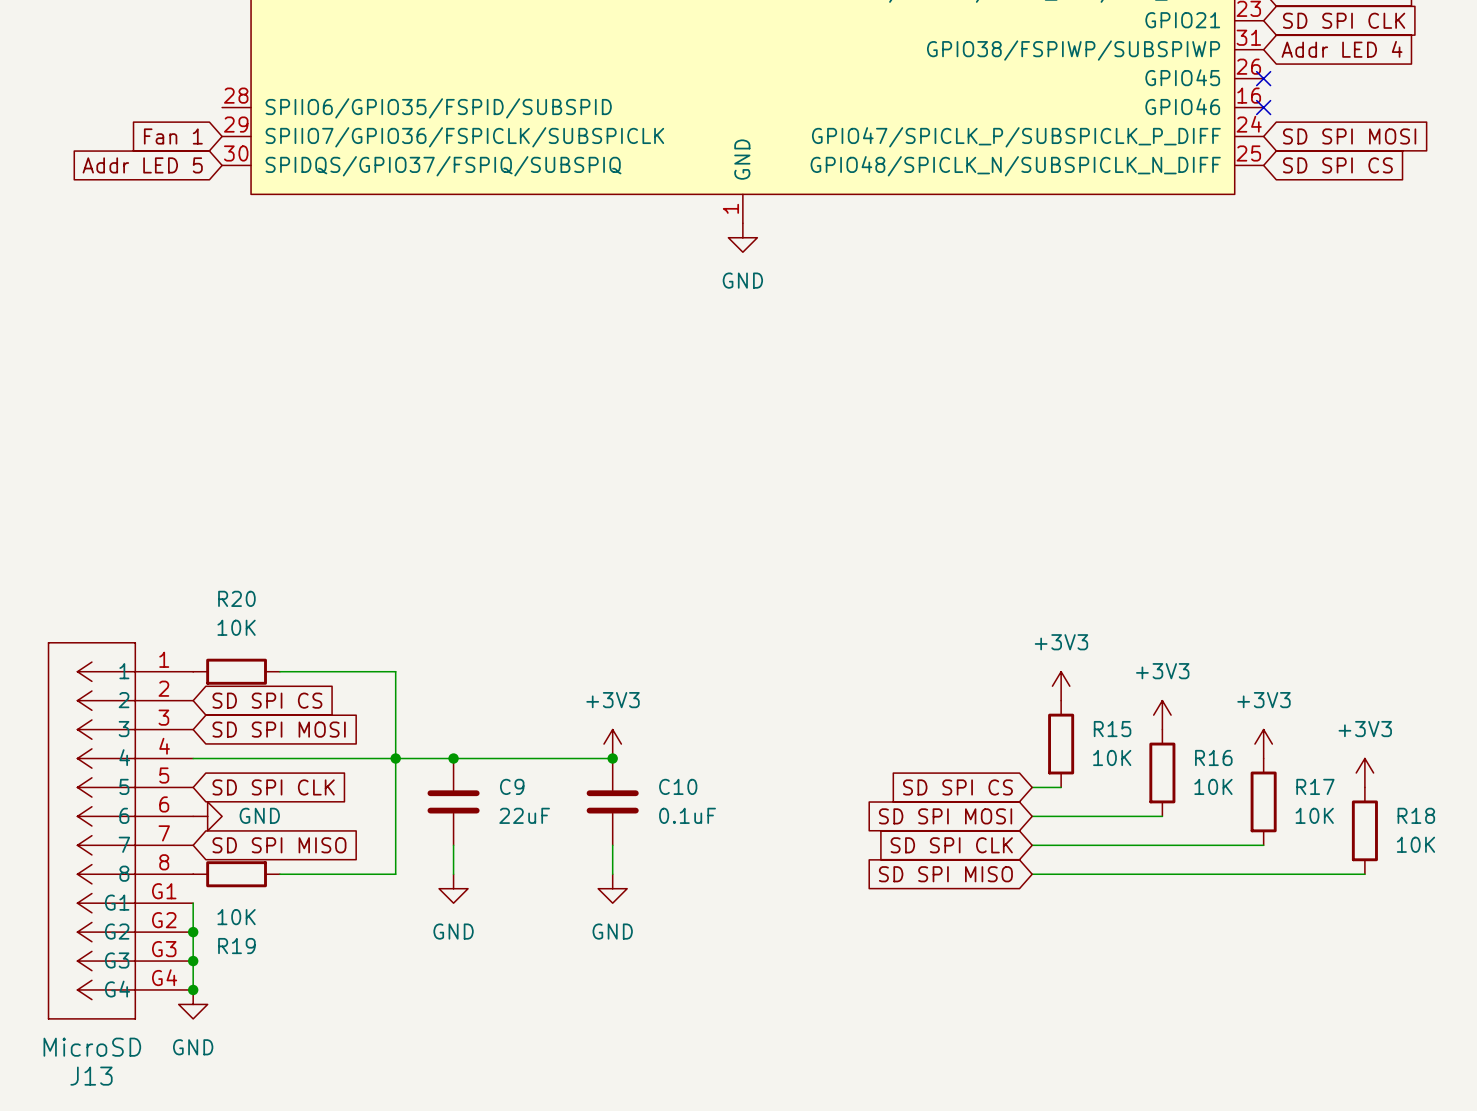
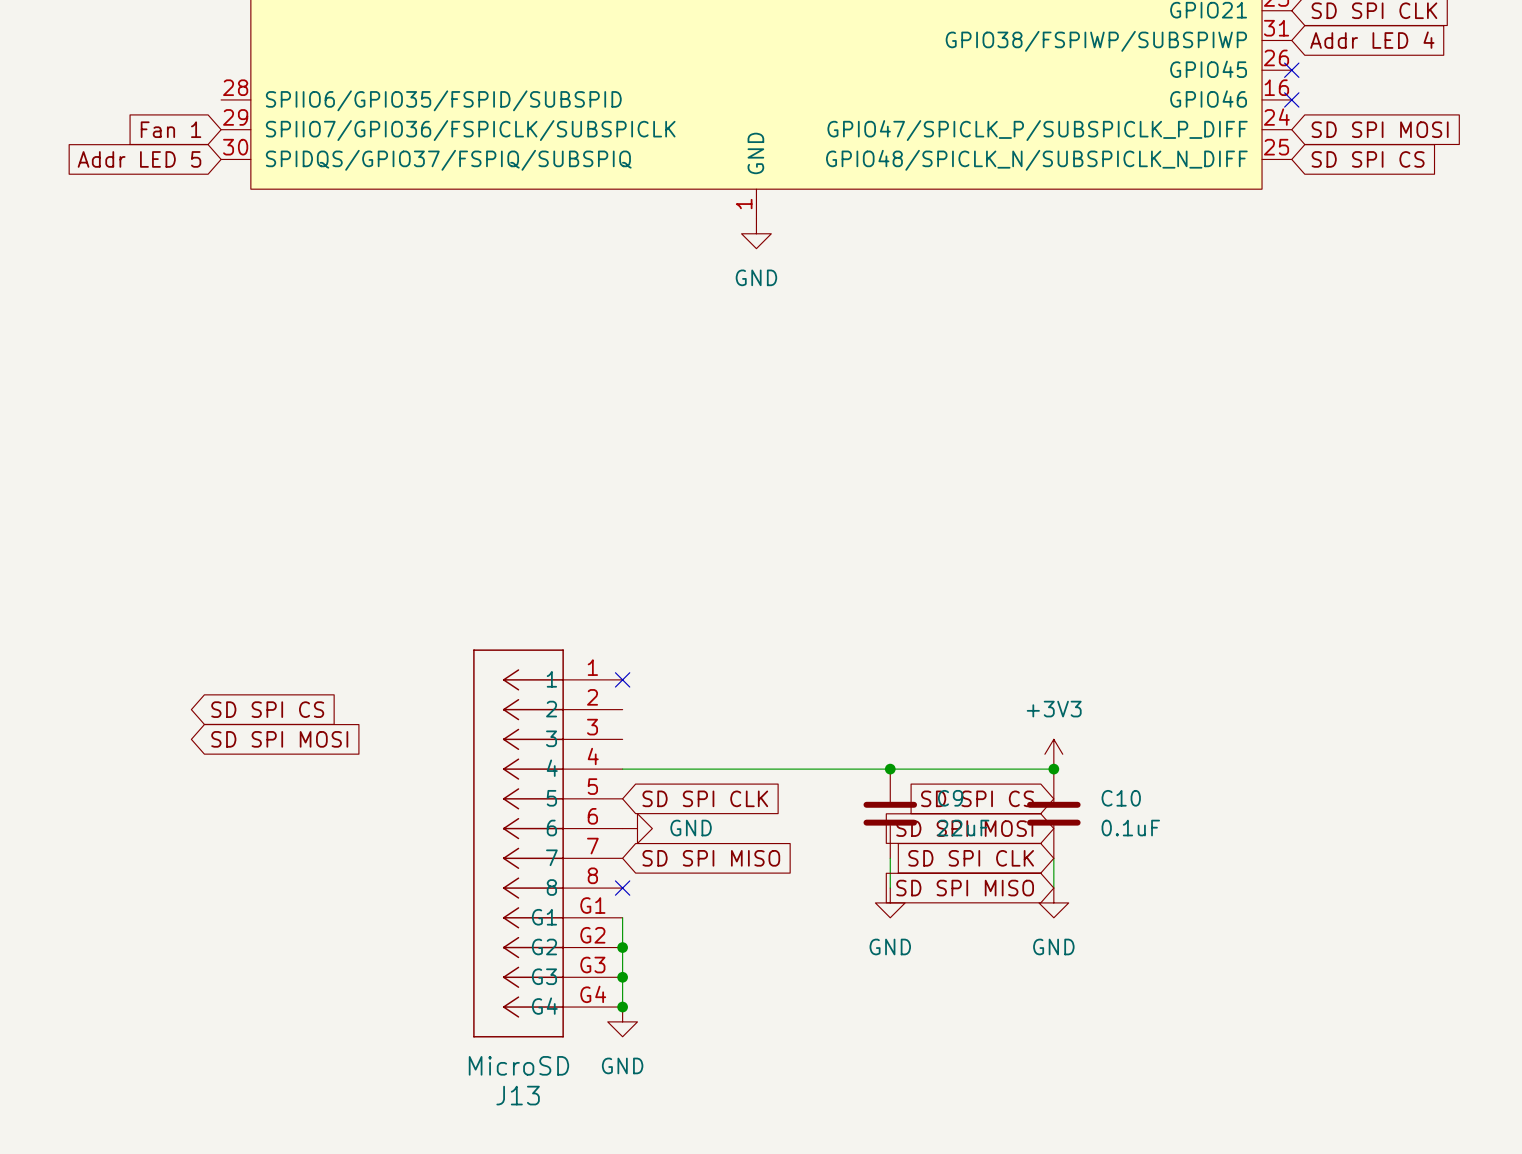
R20: 10K (236, 671) -> none
wire: (279, 671) (395, 671) (395, 874) (279, 874) -> none
no-connect mark: none -> (622, 679)
power symbol position: +3V3 (1061, 686) -> +3V3 (1053, 754)
power symbol: +3V3 (1162, 715) -> none
power symbol: +3V3 (612, 744) -> none
R15: 10K (1061, 744) -> none
power symbol: +3V3 (1263, 744) -> none
wire: (193, 758) (612, 758) -> (1053, 769) (622, 769)
junction: (395, 758) -> none
junction: (453, 758) -> none
junction: (612, 758) -> none
junction: none -> (890, 769)
junction: none -> (1053, 769)
R16: 10K (1162, 772) -> none
power symbol: +3V3 (1364, 772) -> none
global label: SD SPI CLK (273, 787) -> none
global label: none -> SD SPI CLK (705, 798)
wire: (1032, 787) (1061, 787) -> none
C9 position: (453, 801) -> (890, 813)
C10 position: (612, 801) -> (1053, 813)
R17: 10K (1263, 801) -> none
power symbol: GND (207, 816) -> none
power symbol: none -> GND (637, 828)
wire: (1032, 816) (1162, 816) -> none
J13 position: (120, 830) -> (547, 843)
R18: 10K (1364, 830) -> none
global label: SD SPI MISO (279, 845) -> none
wire: (453, 845) (453, 874) -> none
wire: (612, 845) (612, 874) -> (890, 858) (890, 888)
global label: none -> SD SPI MISO (711, 858)
wire: (1032, 845) (1263, 845) -> (1053, 858) (1053, 888)
R19: 10K (236, 874) -> none
no-connect mark: none -> (622, 888)
wire: (1032, 874) (1364, 874) -> none
power symbol: GND (453, 888) -> none
power symbol: GND (612, 888) -> none
power symbol: none -> GND (890, 902)
power symbol: none -> GND (1053, 902)
wire: (193, 903) (193, 989) -> none
wire: none -> (622, 917) (622, 1007)
junction: (193, 932) -> none
junction: none -> (622, 947)
junction: (193, 961) -> none
junction: none -> (622, 977)
junction: (193, 989) -> none
junction: none -> (622, 1007)
power symbol: GND (193, 1004) -> none
power symbol: none -> GND (622, 1021)

